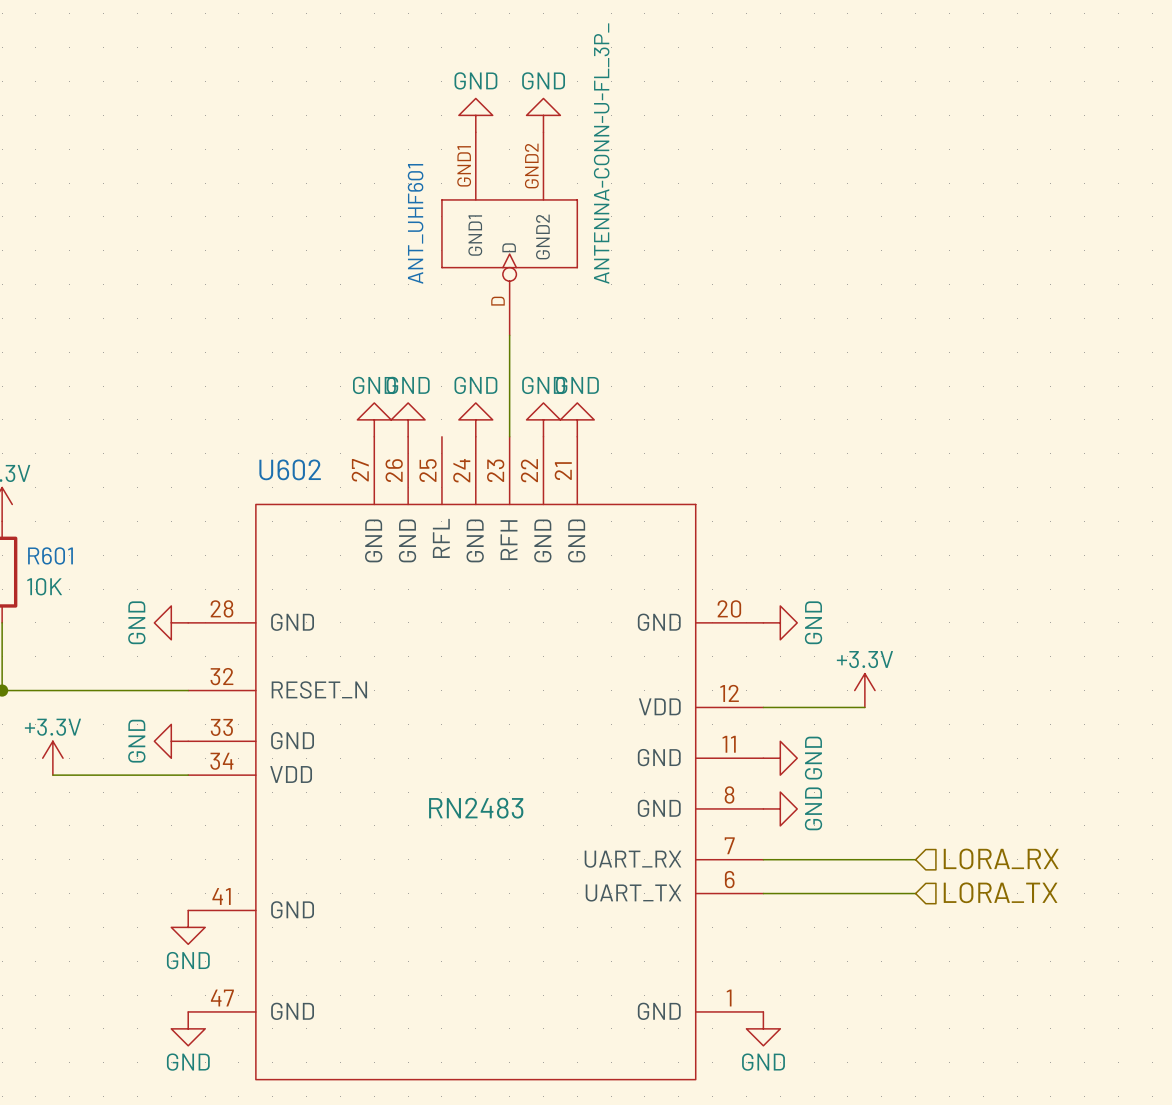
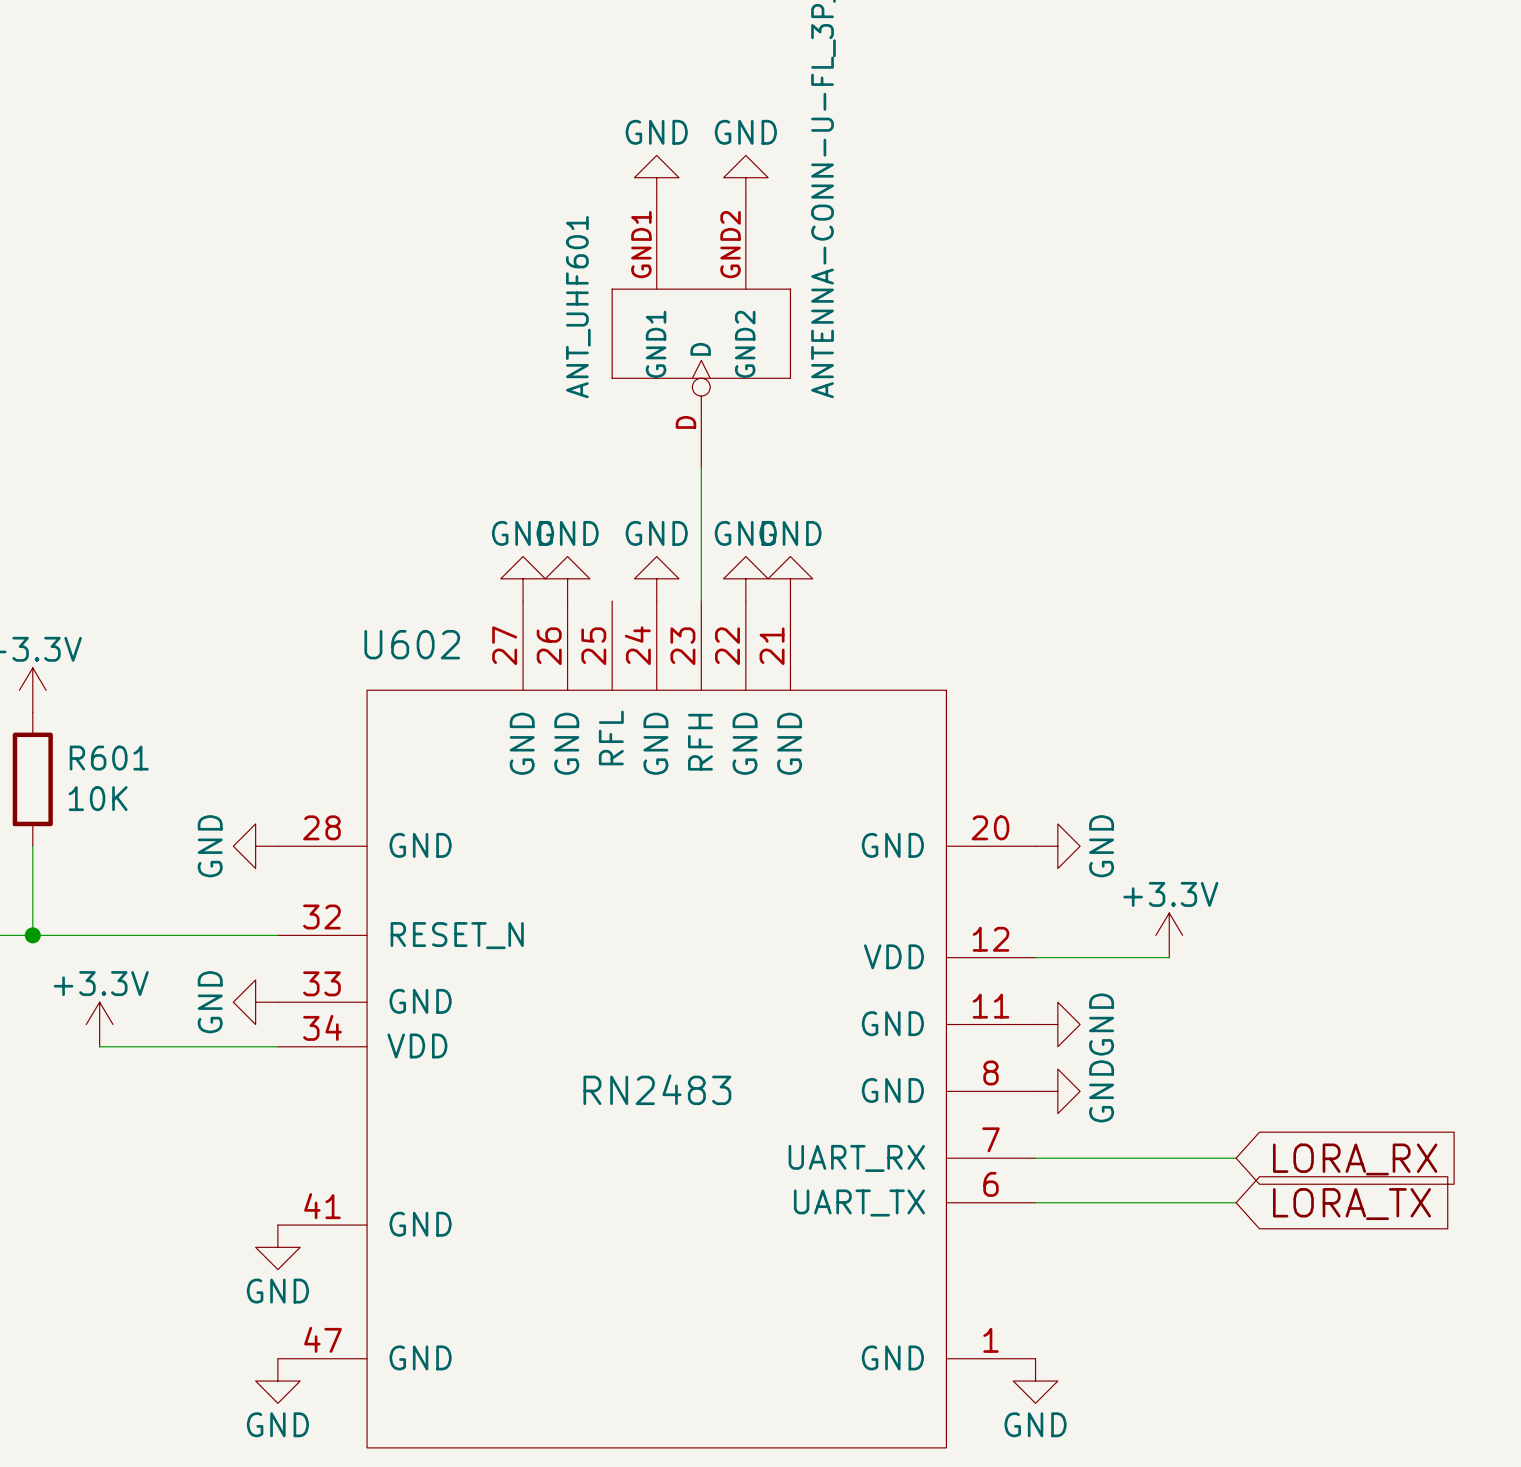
hierarchical label: LORA_RX (1001, 858) -> none
global label: none -> LORA_RX (1355, 1159)
hierarchical label: LORA_TX (1000, 892) -> none
global label: none -> LORA_TX (1351, 1204)

